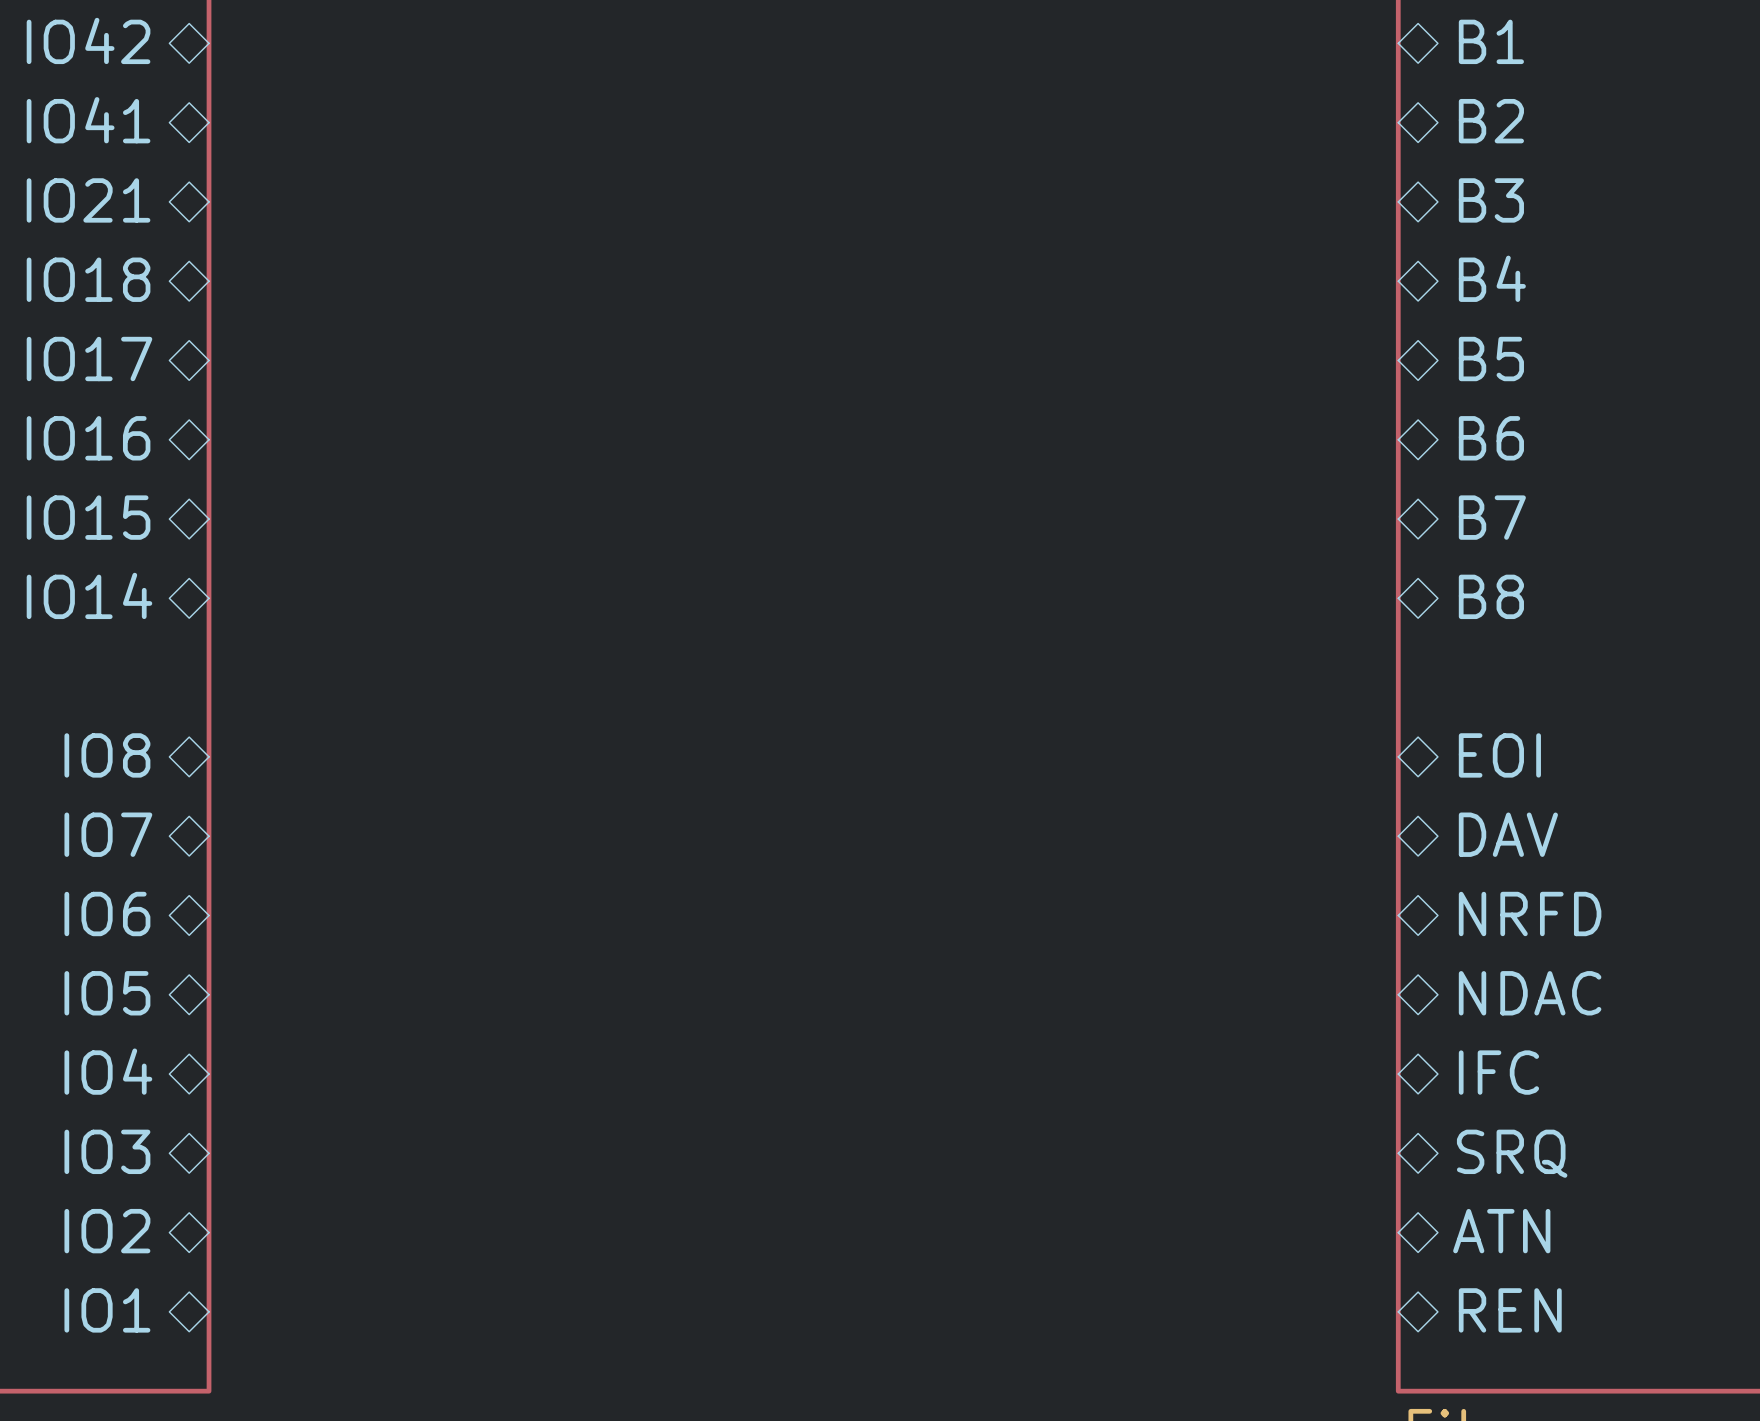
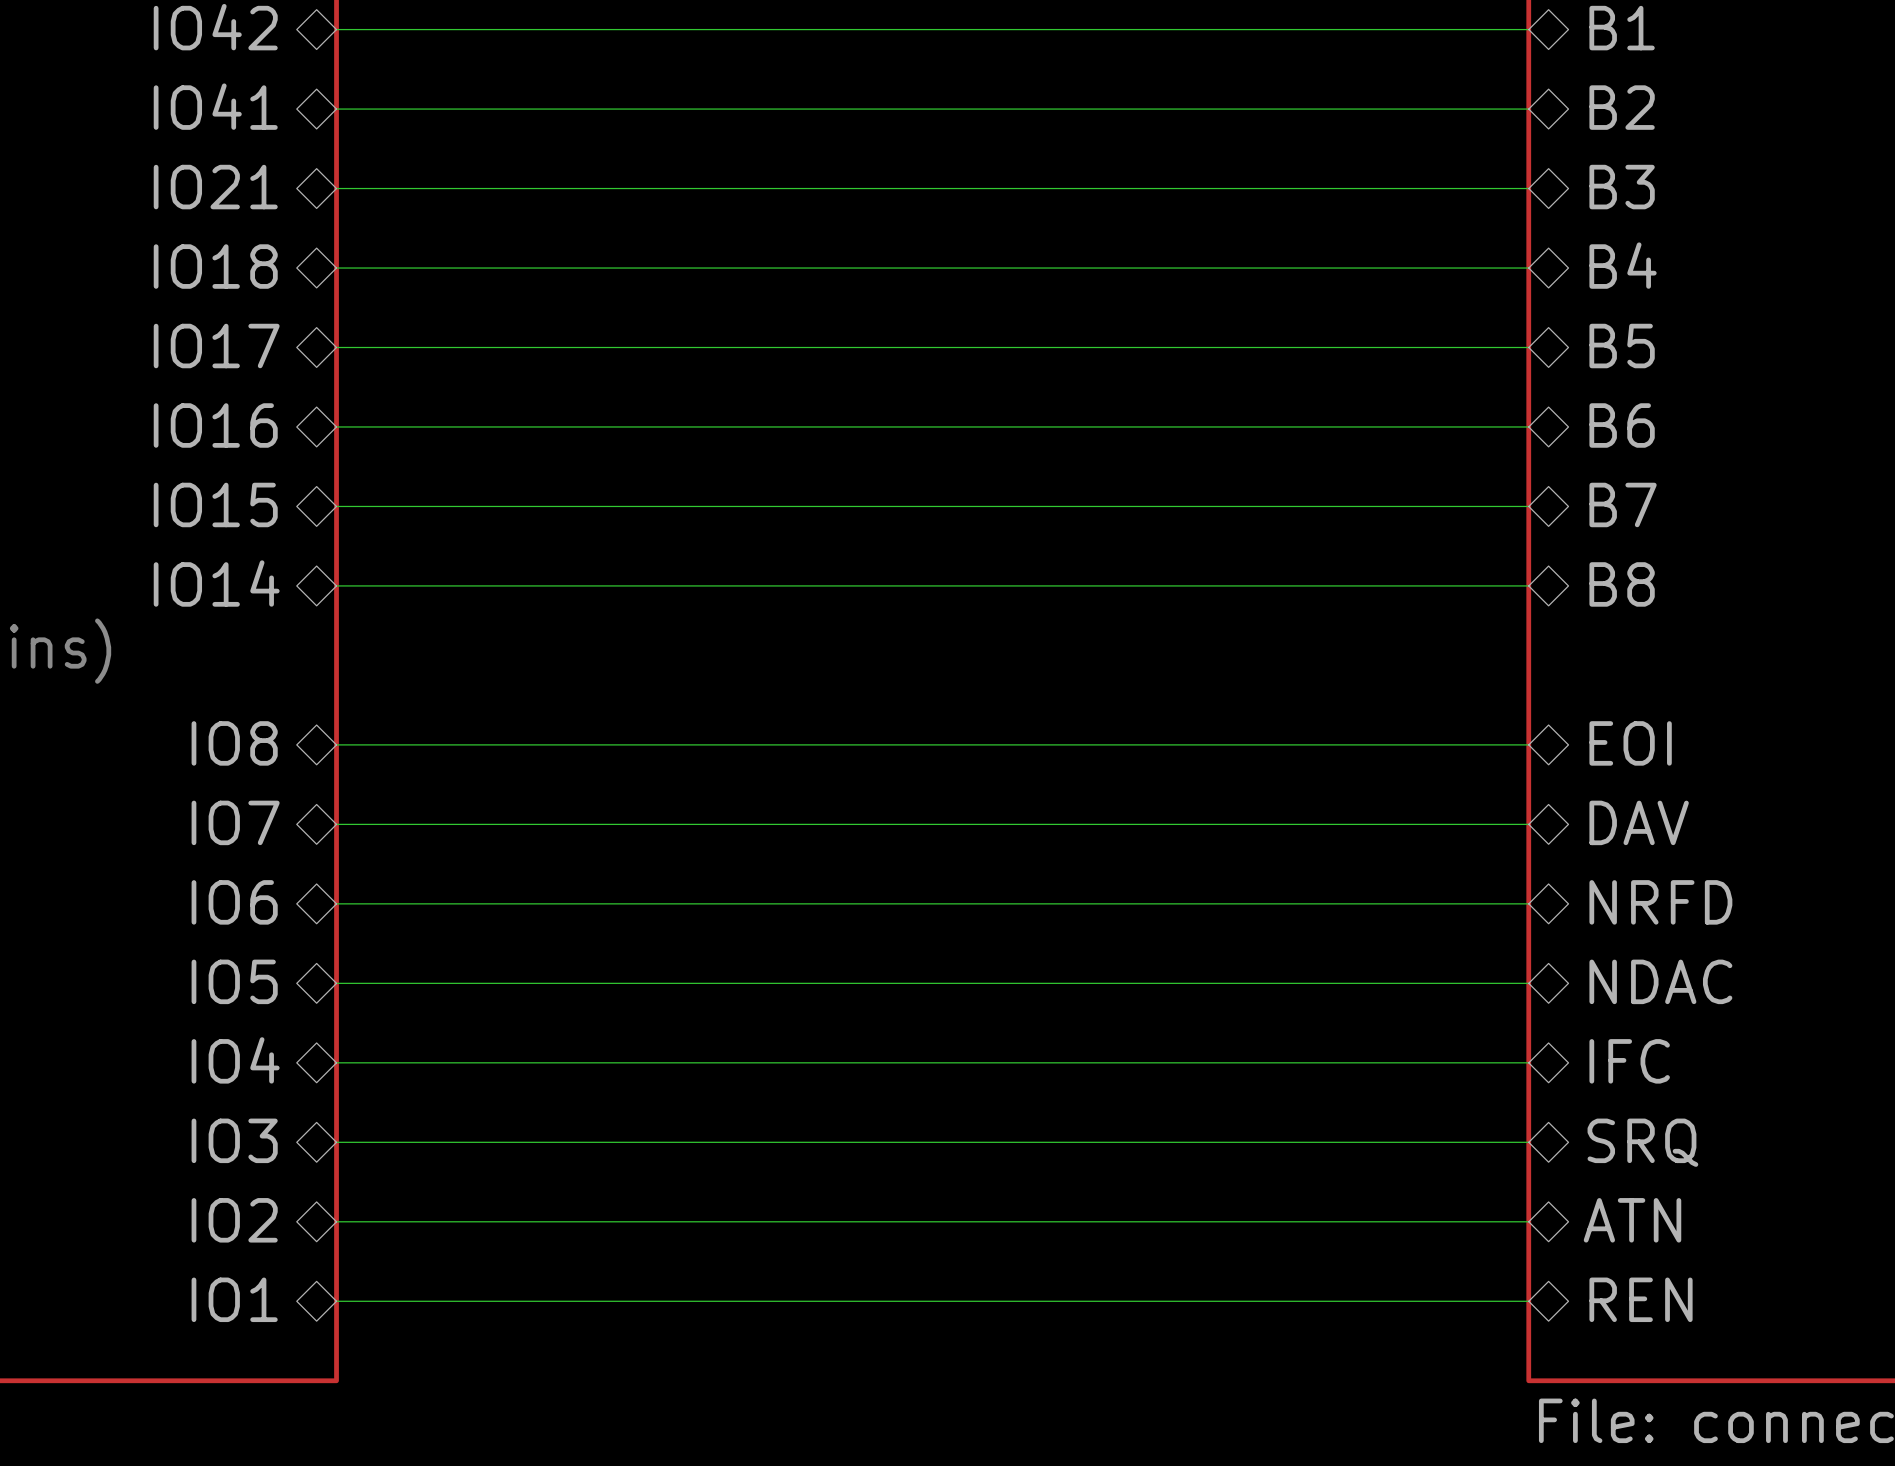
wire: none -> (336, 29) (1528, 29)
wire: none -> (336, 109) (1528, 109)
wire: none -> (336, 188) (1528, 188)
wire: none -> (336, 268) (1528, 268)
wire: none -> (336, 347) (1528, 347)
wire: none -> (336, 426) (1528, 426)
wire: none -> (336, 506) (1528, 506)
wire: none -> (336, 585) (1528, 585)
wire: none -> (336, 744) (1528, 744)
wire: none -> (336, 824) (1528, 824)
wire: none -> (336, 903) (1528, 903)
wire: none -> (336, 983) (1528, 983)
wire: none -> (336, 1062) (1528, 1062)
wire: none -> (336, 1142) (1528, 1142)
wire: none -> (336, 1221) (1528, 1221)
wire: none -> (336, 1301) (1528, 1301)

